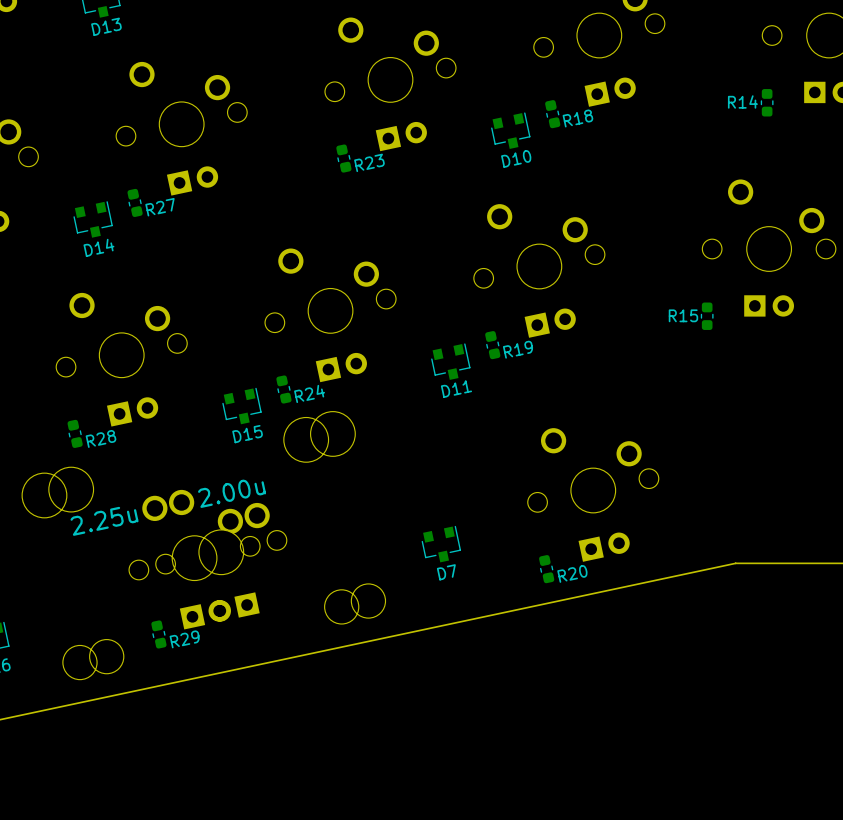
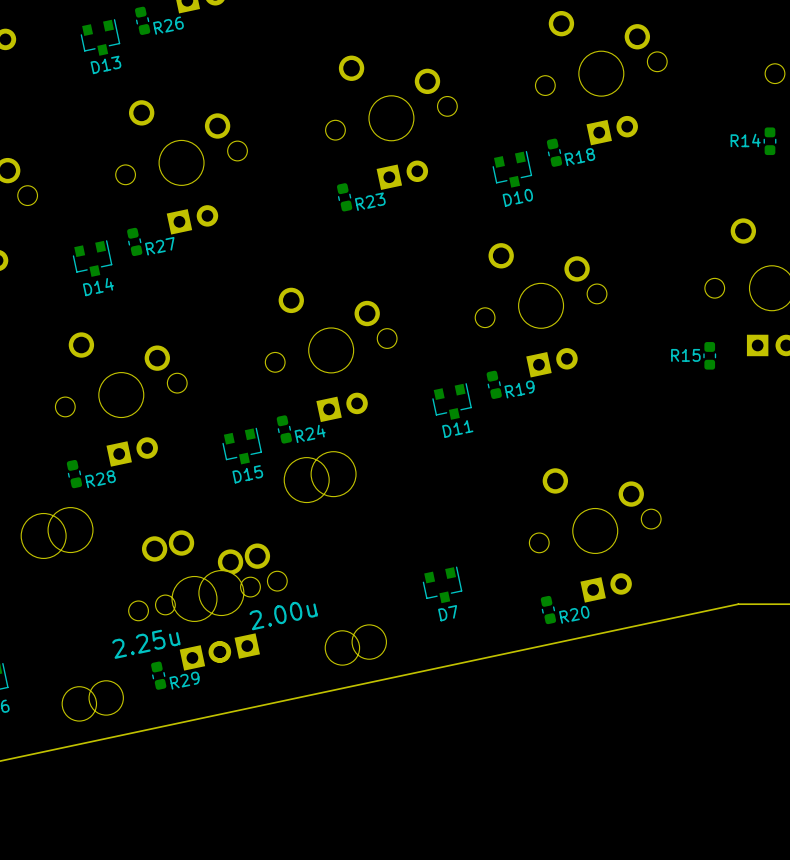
text position: 2.00u (232, 493) -> 2.00u (283, 616)
text position: 2.25u (104, 521) -> 2.25u (146, 644)

